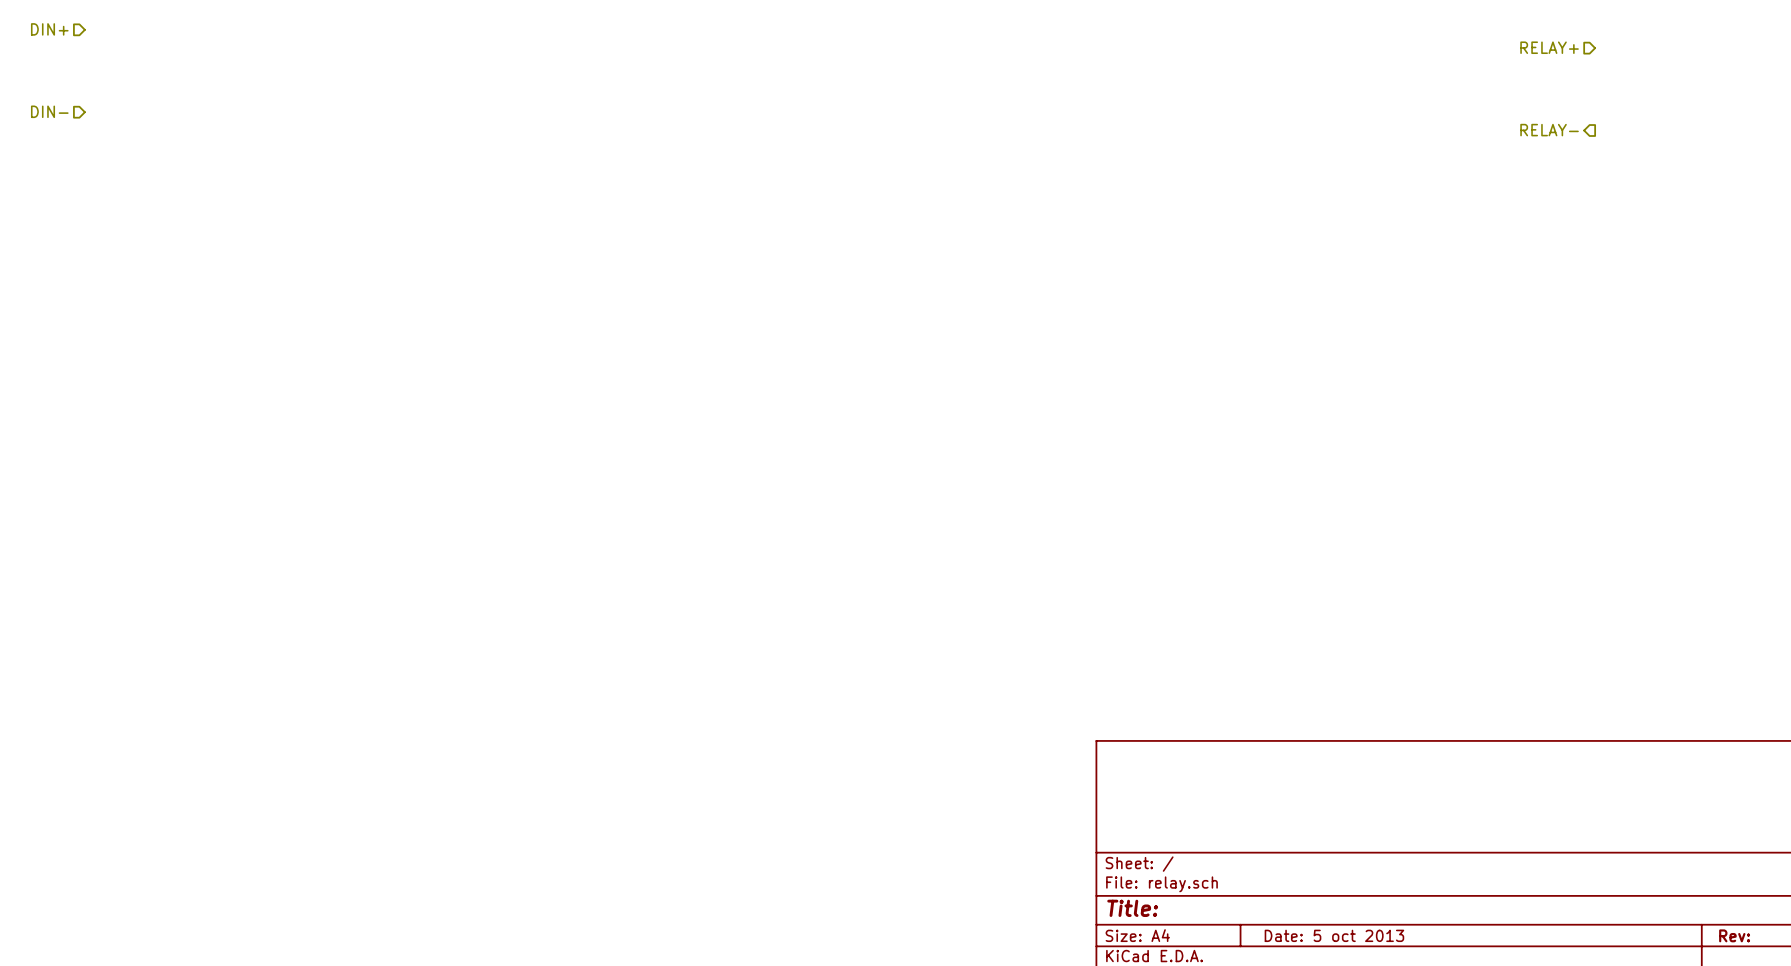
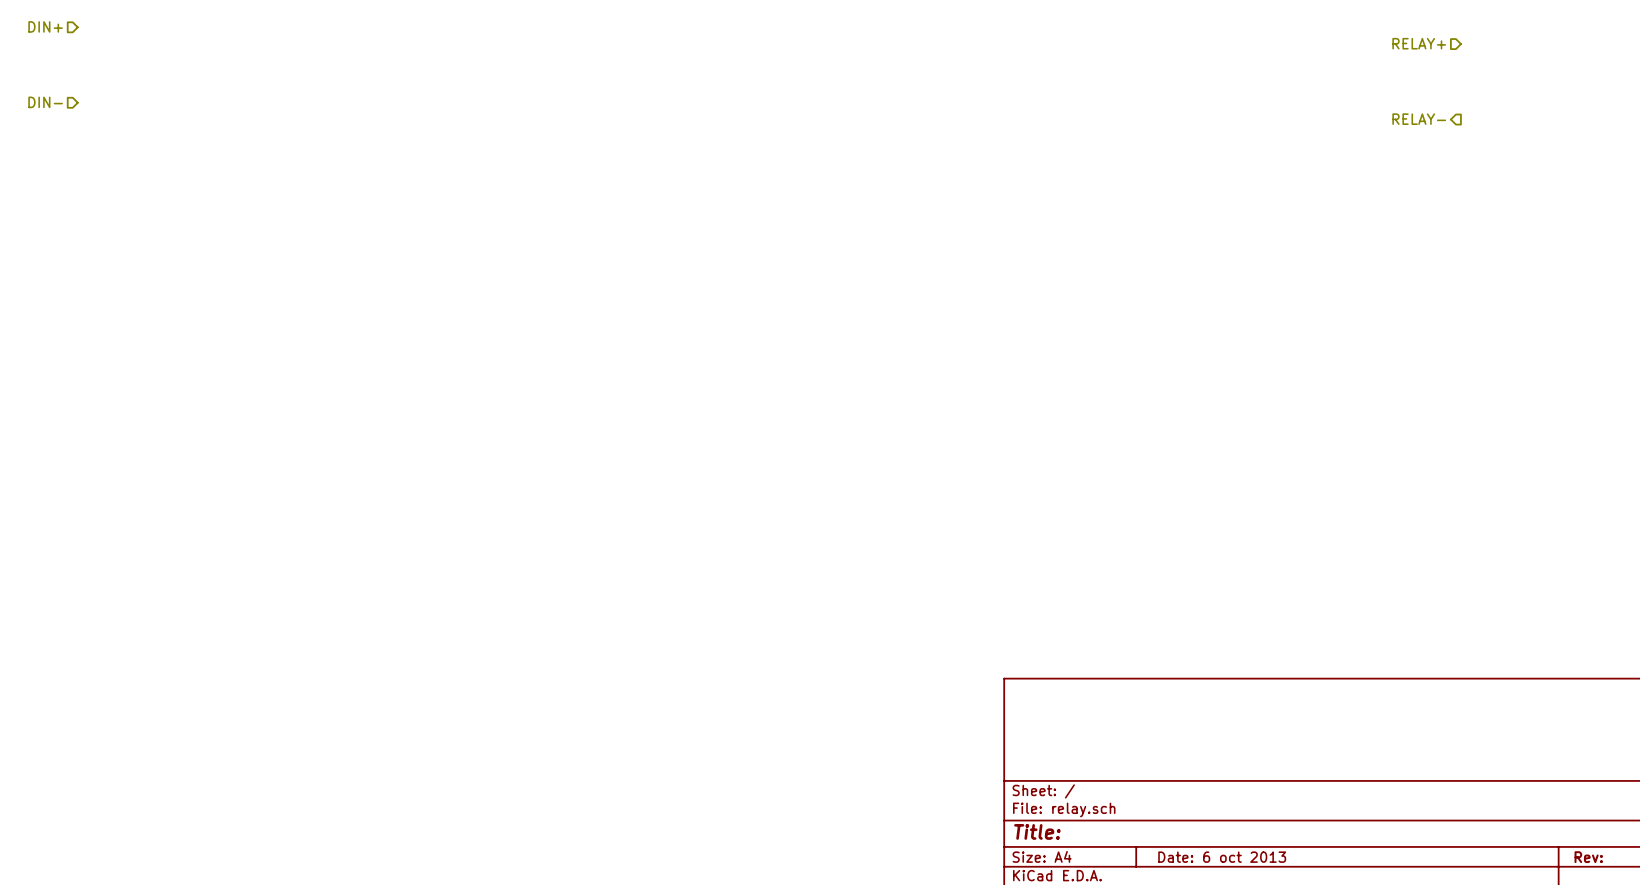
title block: Date: 5 oct 2013 (1334, 935) -> Date: 6 oct 2013 (1222, 857)

